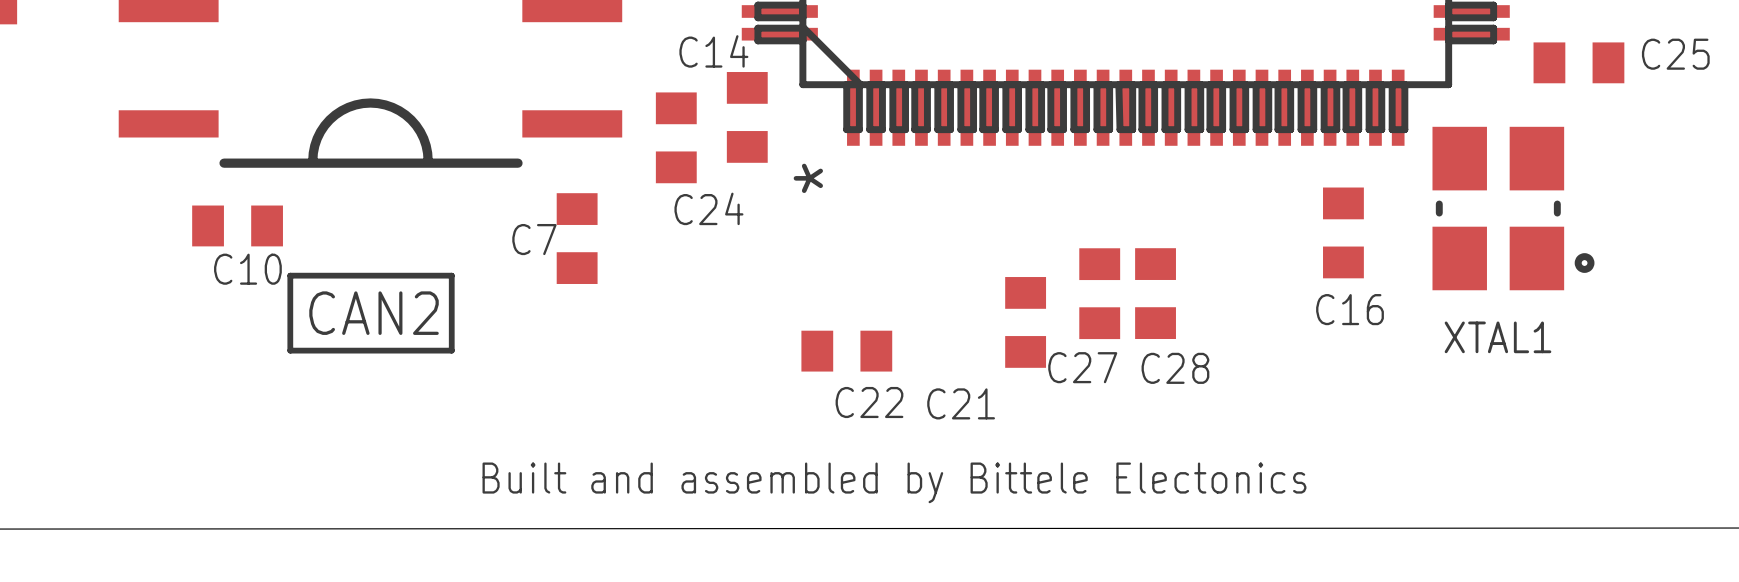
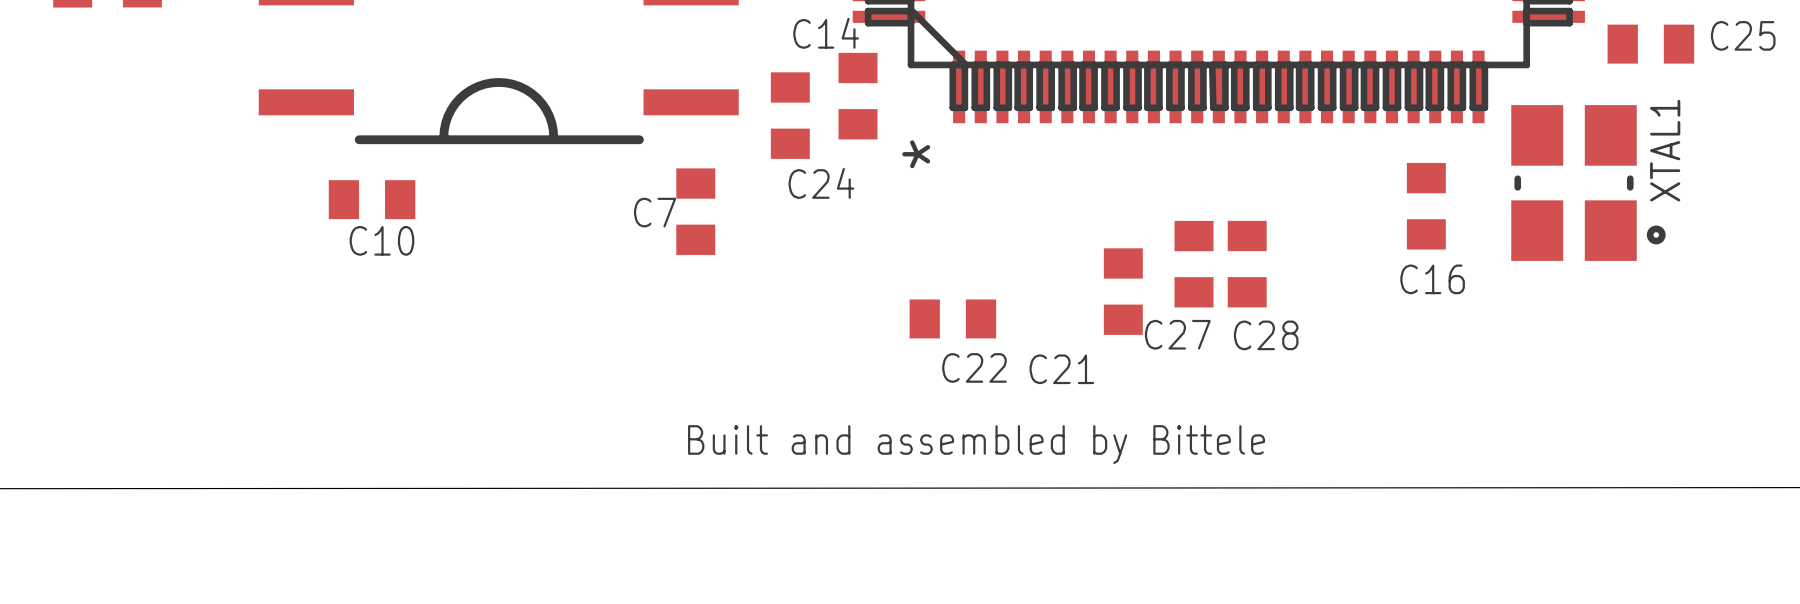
line: (290, 275) (290, 350) (451, 350) (451, 275) (290, 275) -> none
text: CAN2 (374, 313) -> none
XTAL1 name rotation: 0° (1498, 337) -> 90° counterclockwise (1665, 150)
XTAL1 name position: XTAL1 (1498, 337) -> XTAL1 (1665, 150)
text: Built and assembled by Bittele Electonics (894, 482) -> Built and assembled by Bittele (976, 444)

